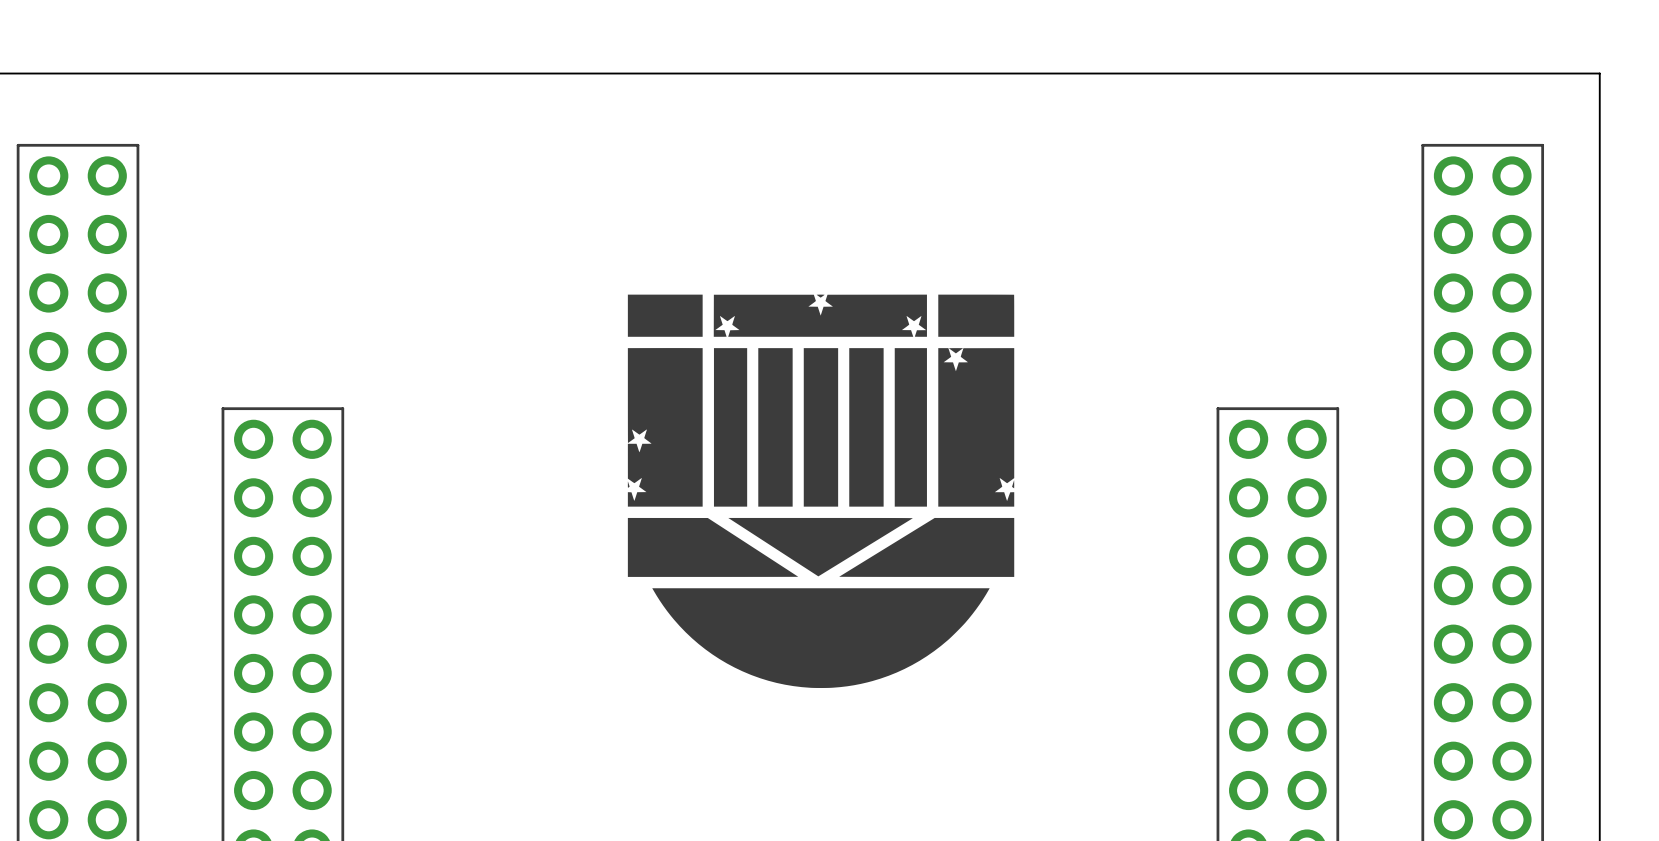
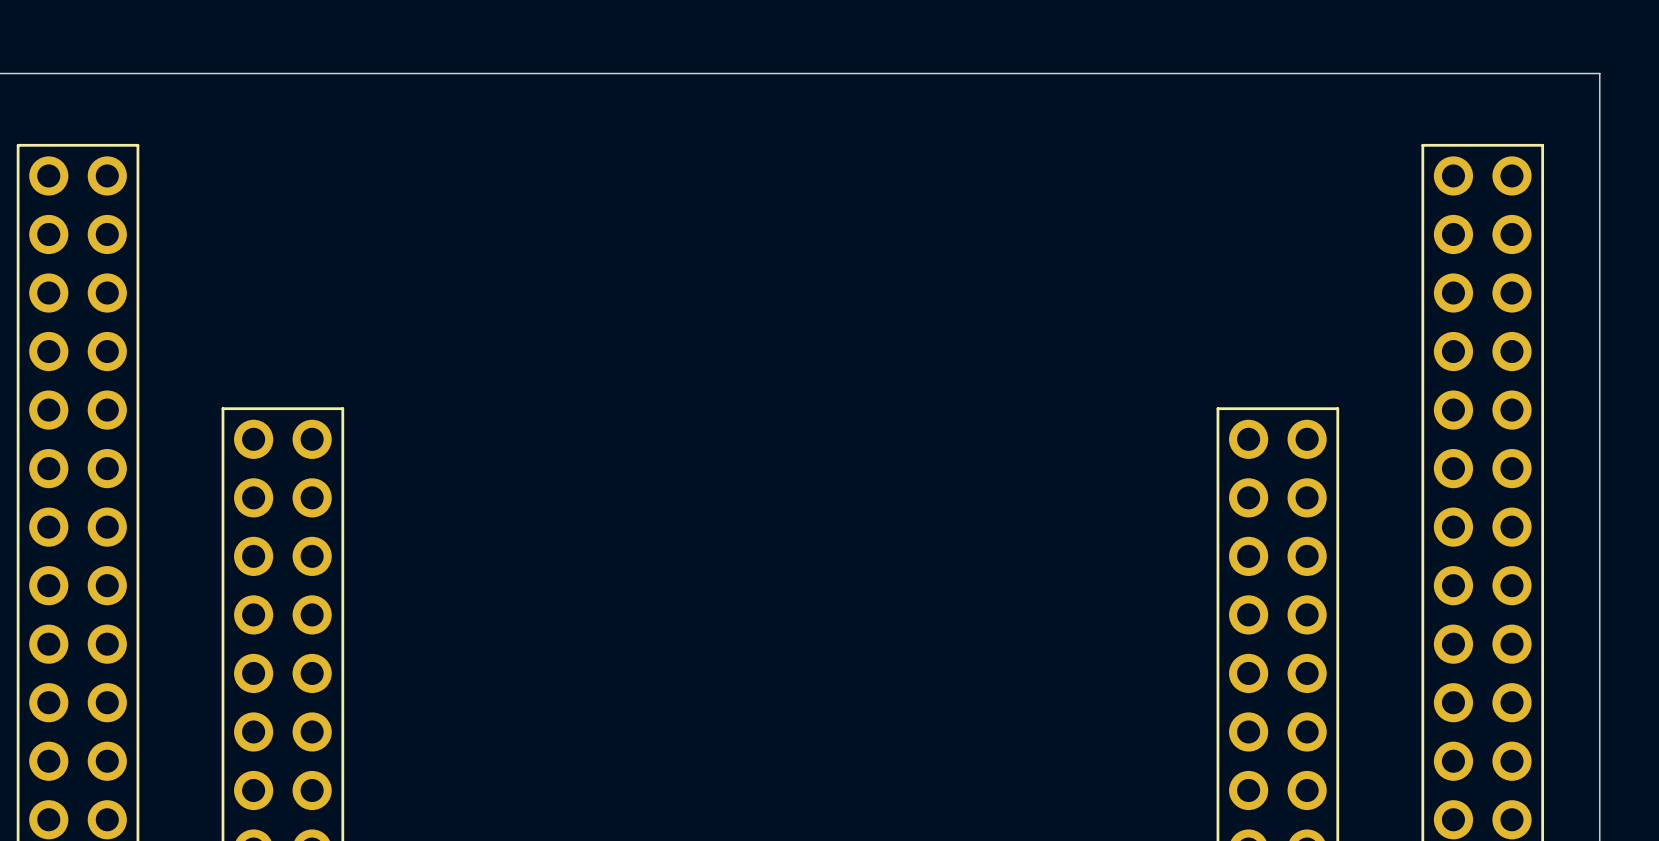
drawing: [627, 294, 1015, 689] -> none

